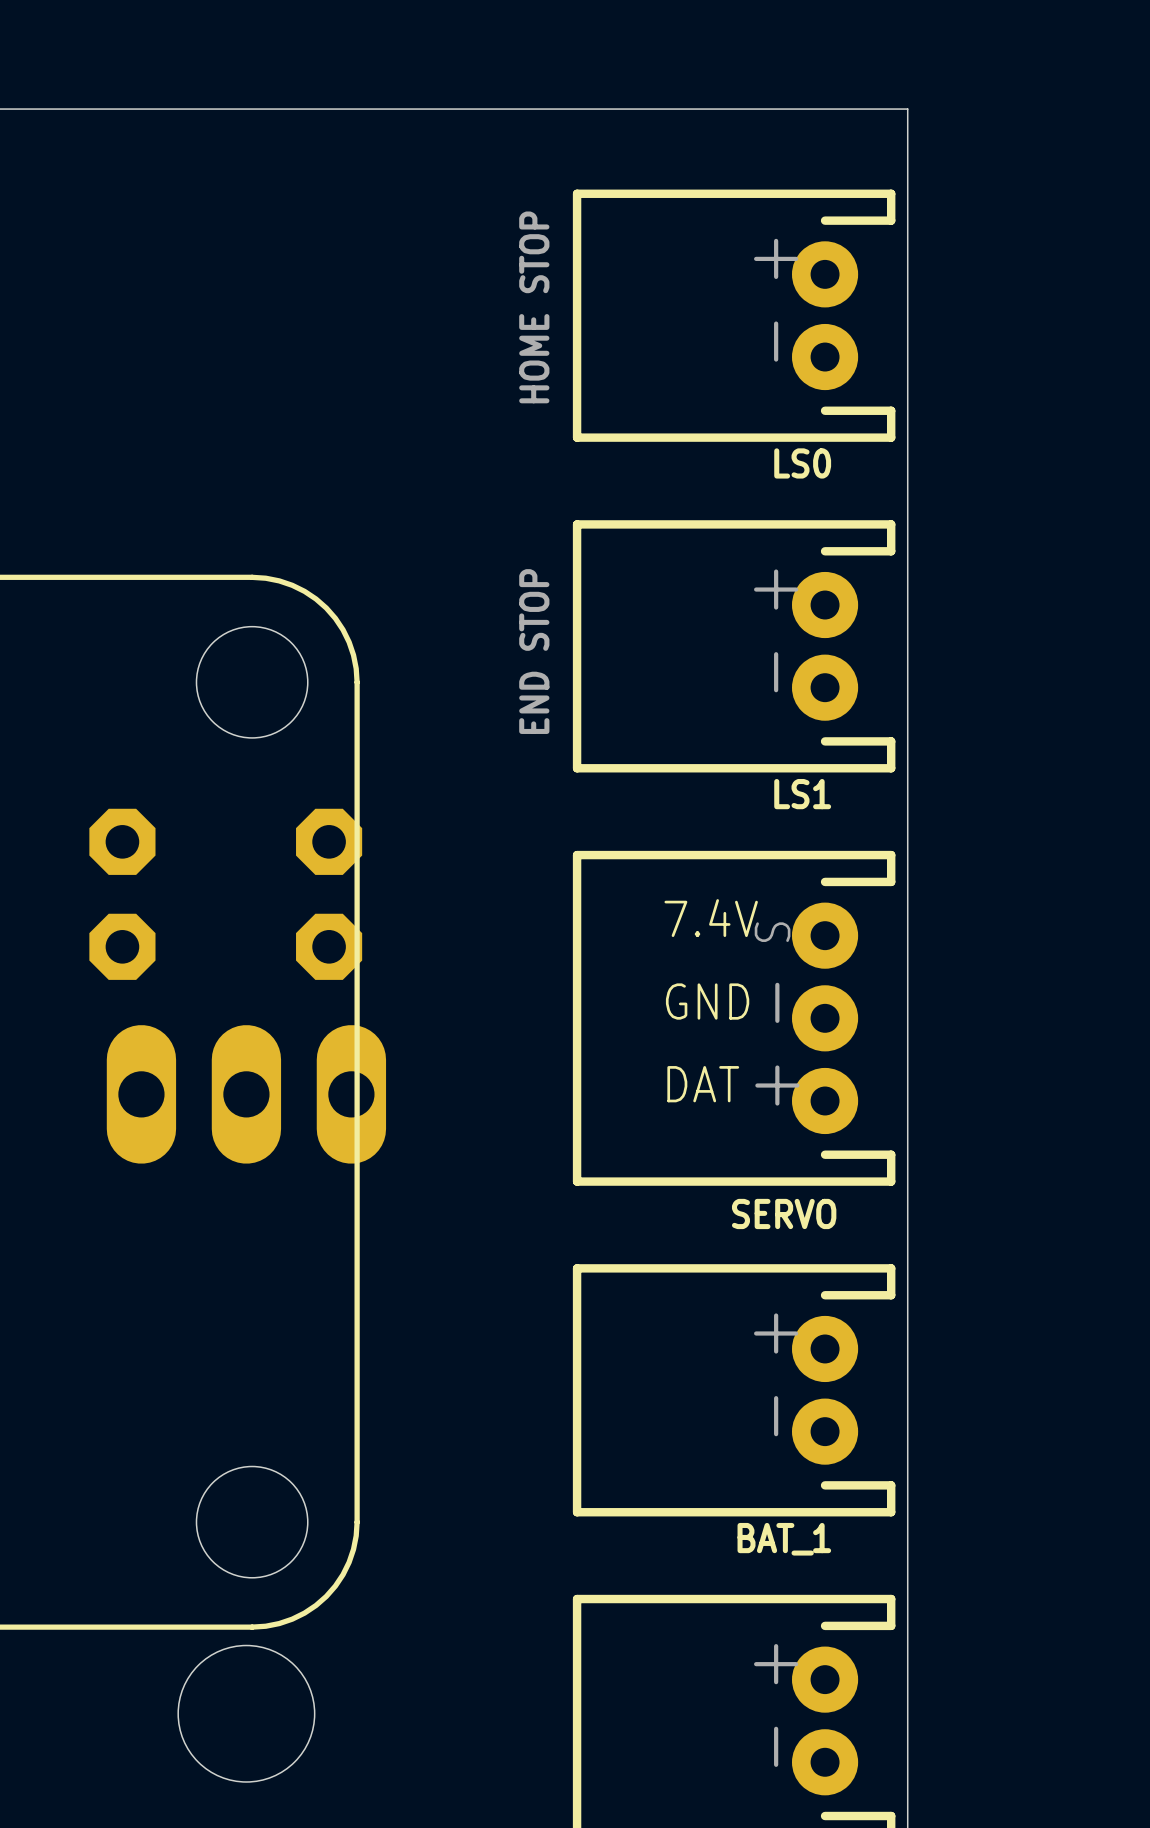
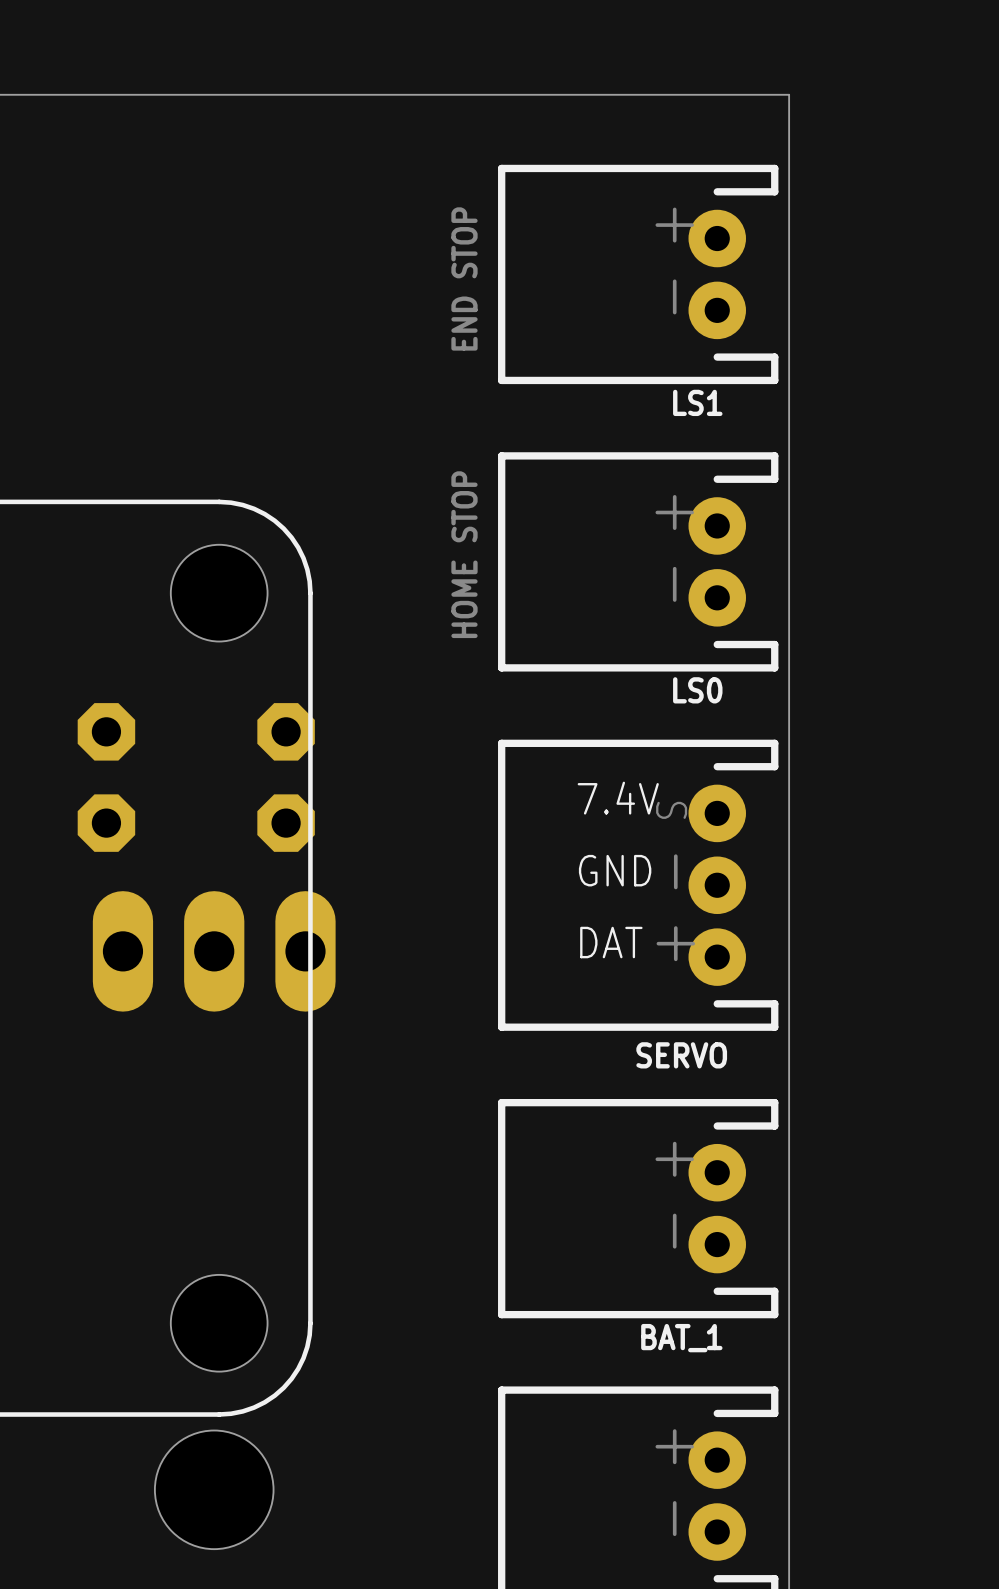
LS0 value: HOME STOP (534, 307) -> END STOP (464, 278)
LS0 name: LS0 (802, 463) -> LS1 (697, 402)
LS1 value: END STOP (534, 651) -> HOME STOP (464, 554)
LS1 name: LS1 (802, 794) -> LS0 (697, 690)

